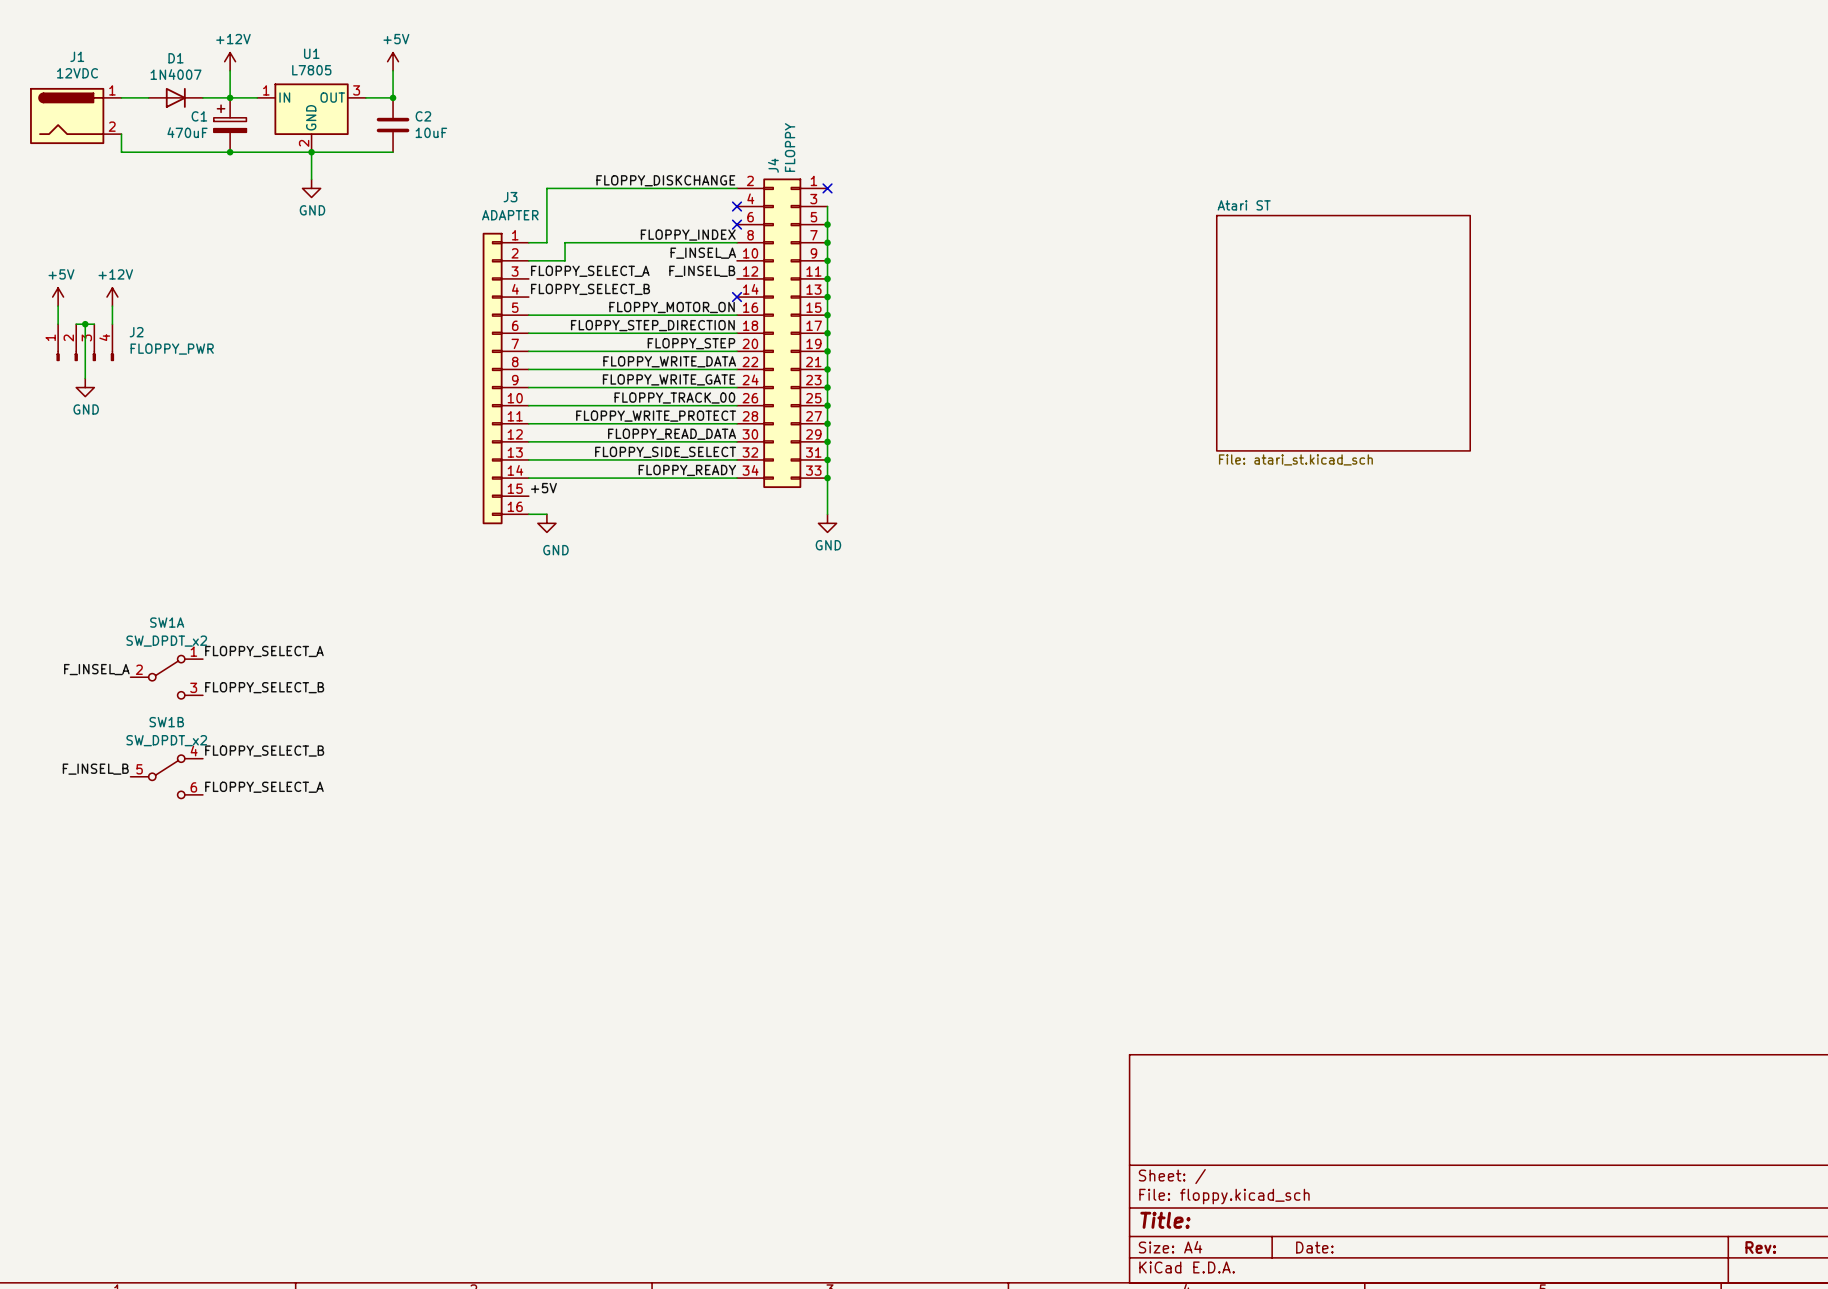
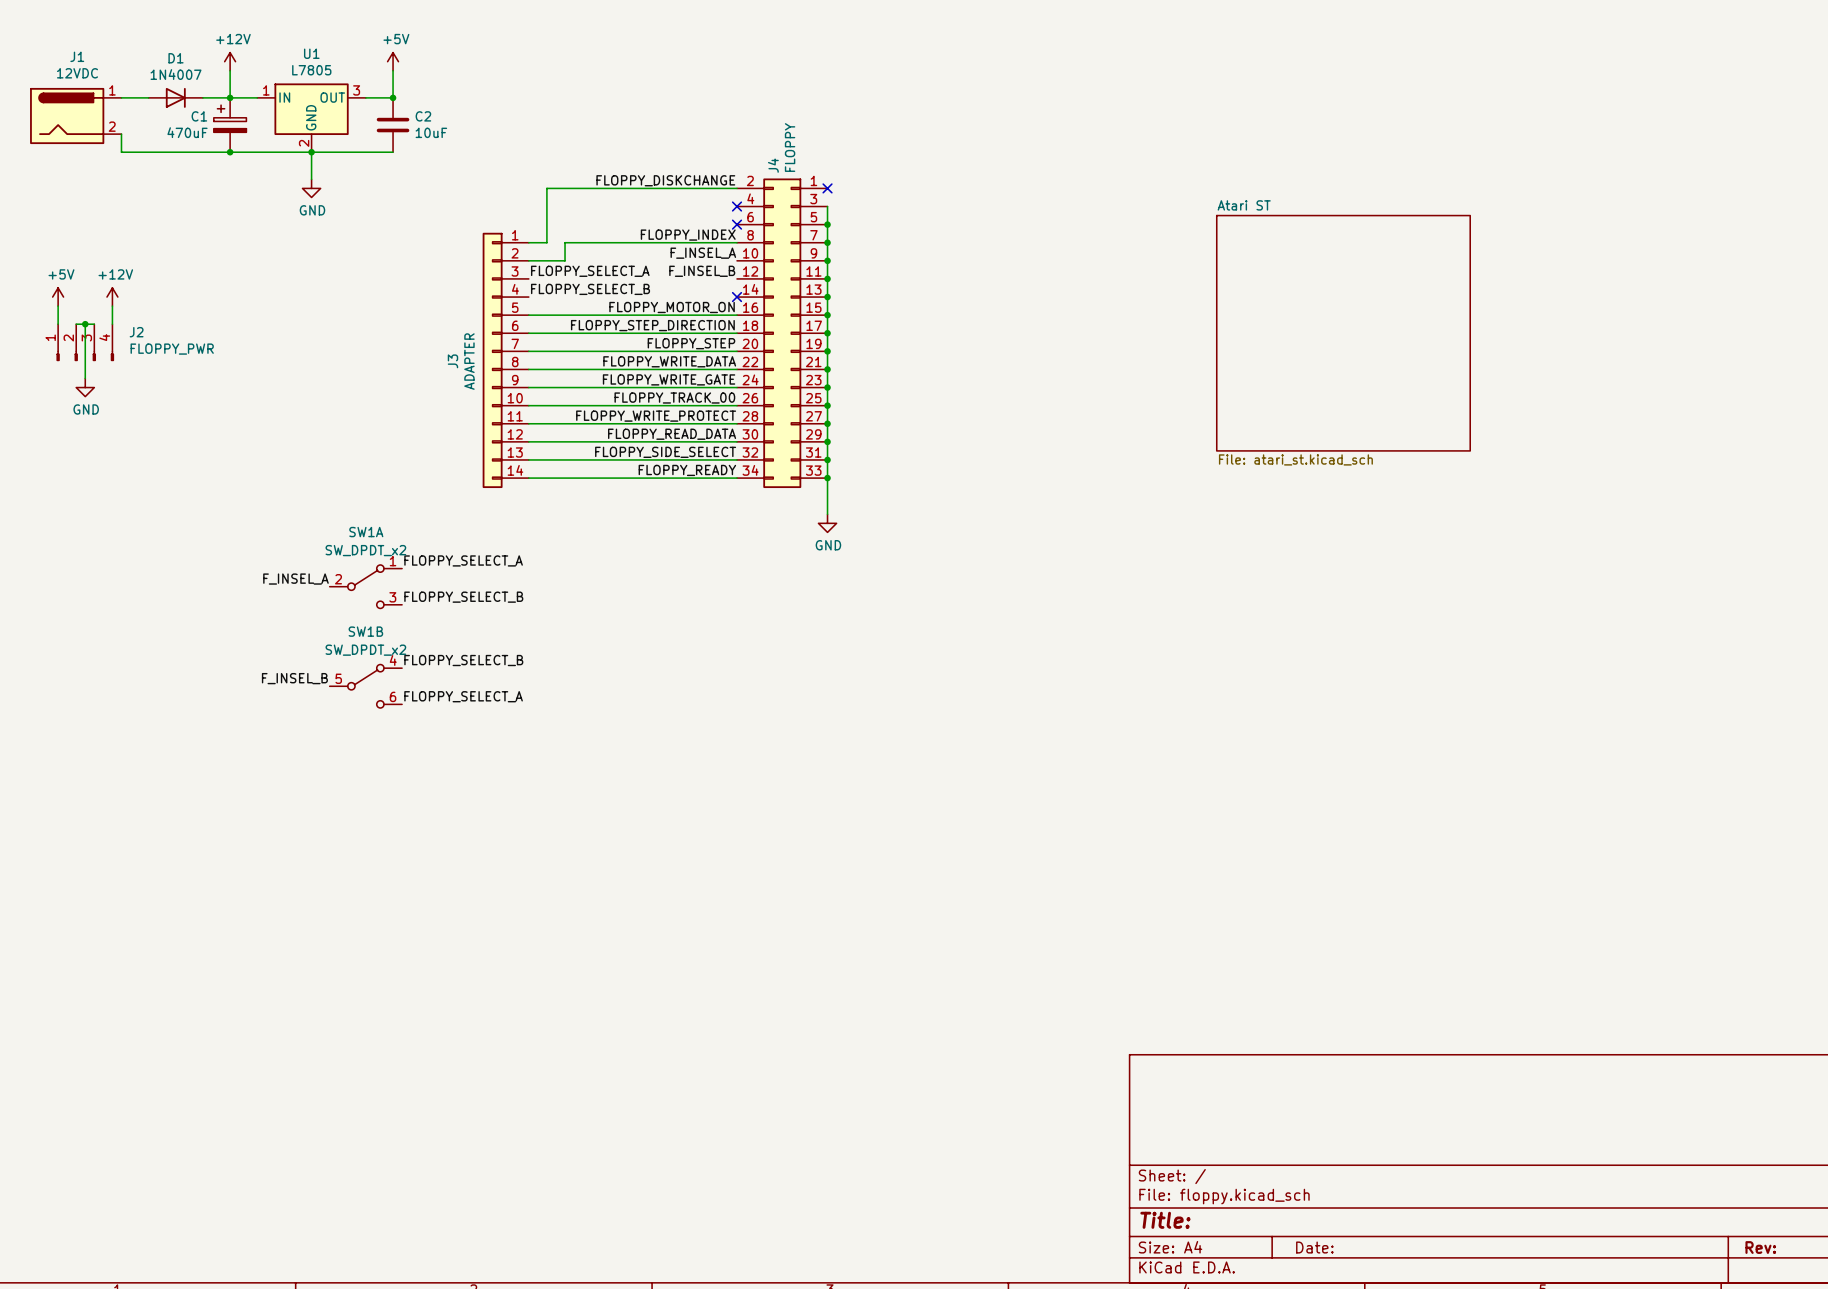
J3 name position: J3 (510, 197) -> J3 (452, 361)
J3 value position: ADAPTER (510, 215) -> ADAPTER (469, 361)
J3 symbol: [482, 232, 529, 525] -> [482, 232, 529, 489]
label: +5V (543, 488) -> none
wire: (528, 514) (546, 514) -> none
power symbol: GND (546, 523) -> none
label: none -> FLOPPY_SELECT_A (463, 560)
label: none -> F_INSEL_A (295, 579)
label: none -> FLOPPY_SELECT_B (463, 597)
label: FLOPPY_SELECT_A (264, 651) -> none
label: none -> FLOPPY_SELECT_B (463, 660)
label: F_INSEL_A (96, 669) -> none
SW1A position: (166, 677) -> (365, 586)
label: none -> F_INSEL_B (294, 678)
label: FLOPPY_SELECT_B (264, 687) -> none
label: none -> FLOPPY_SELECT_A (463, 696)
label: FLOPPY_SELECT_B (264, 751) -> none
label: F_INSEL_B (95, 769) -> none
SW1B position: (166, 776) -> (365, 686)
label: FLOPPY_SELECT_A (264, 787) -> none

